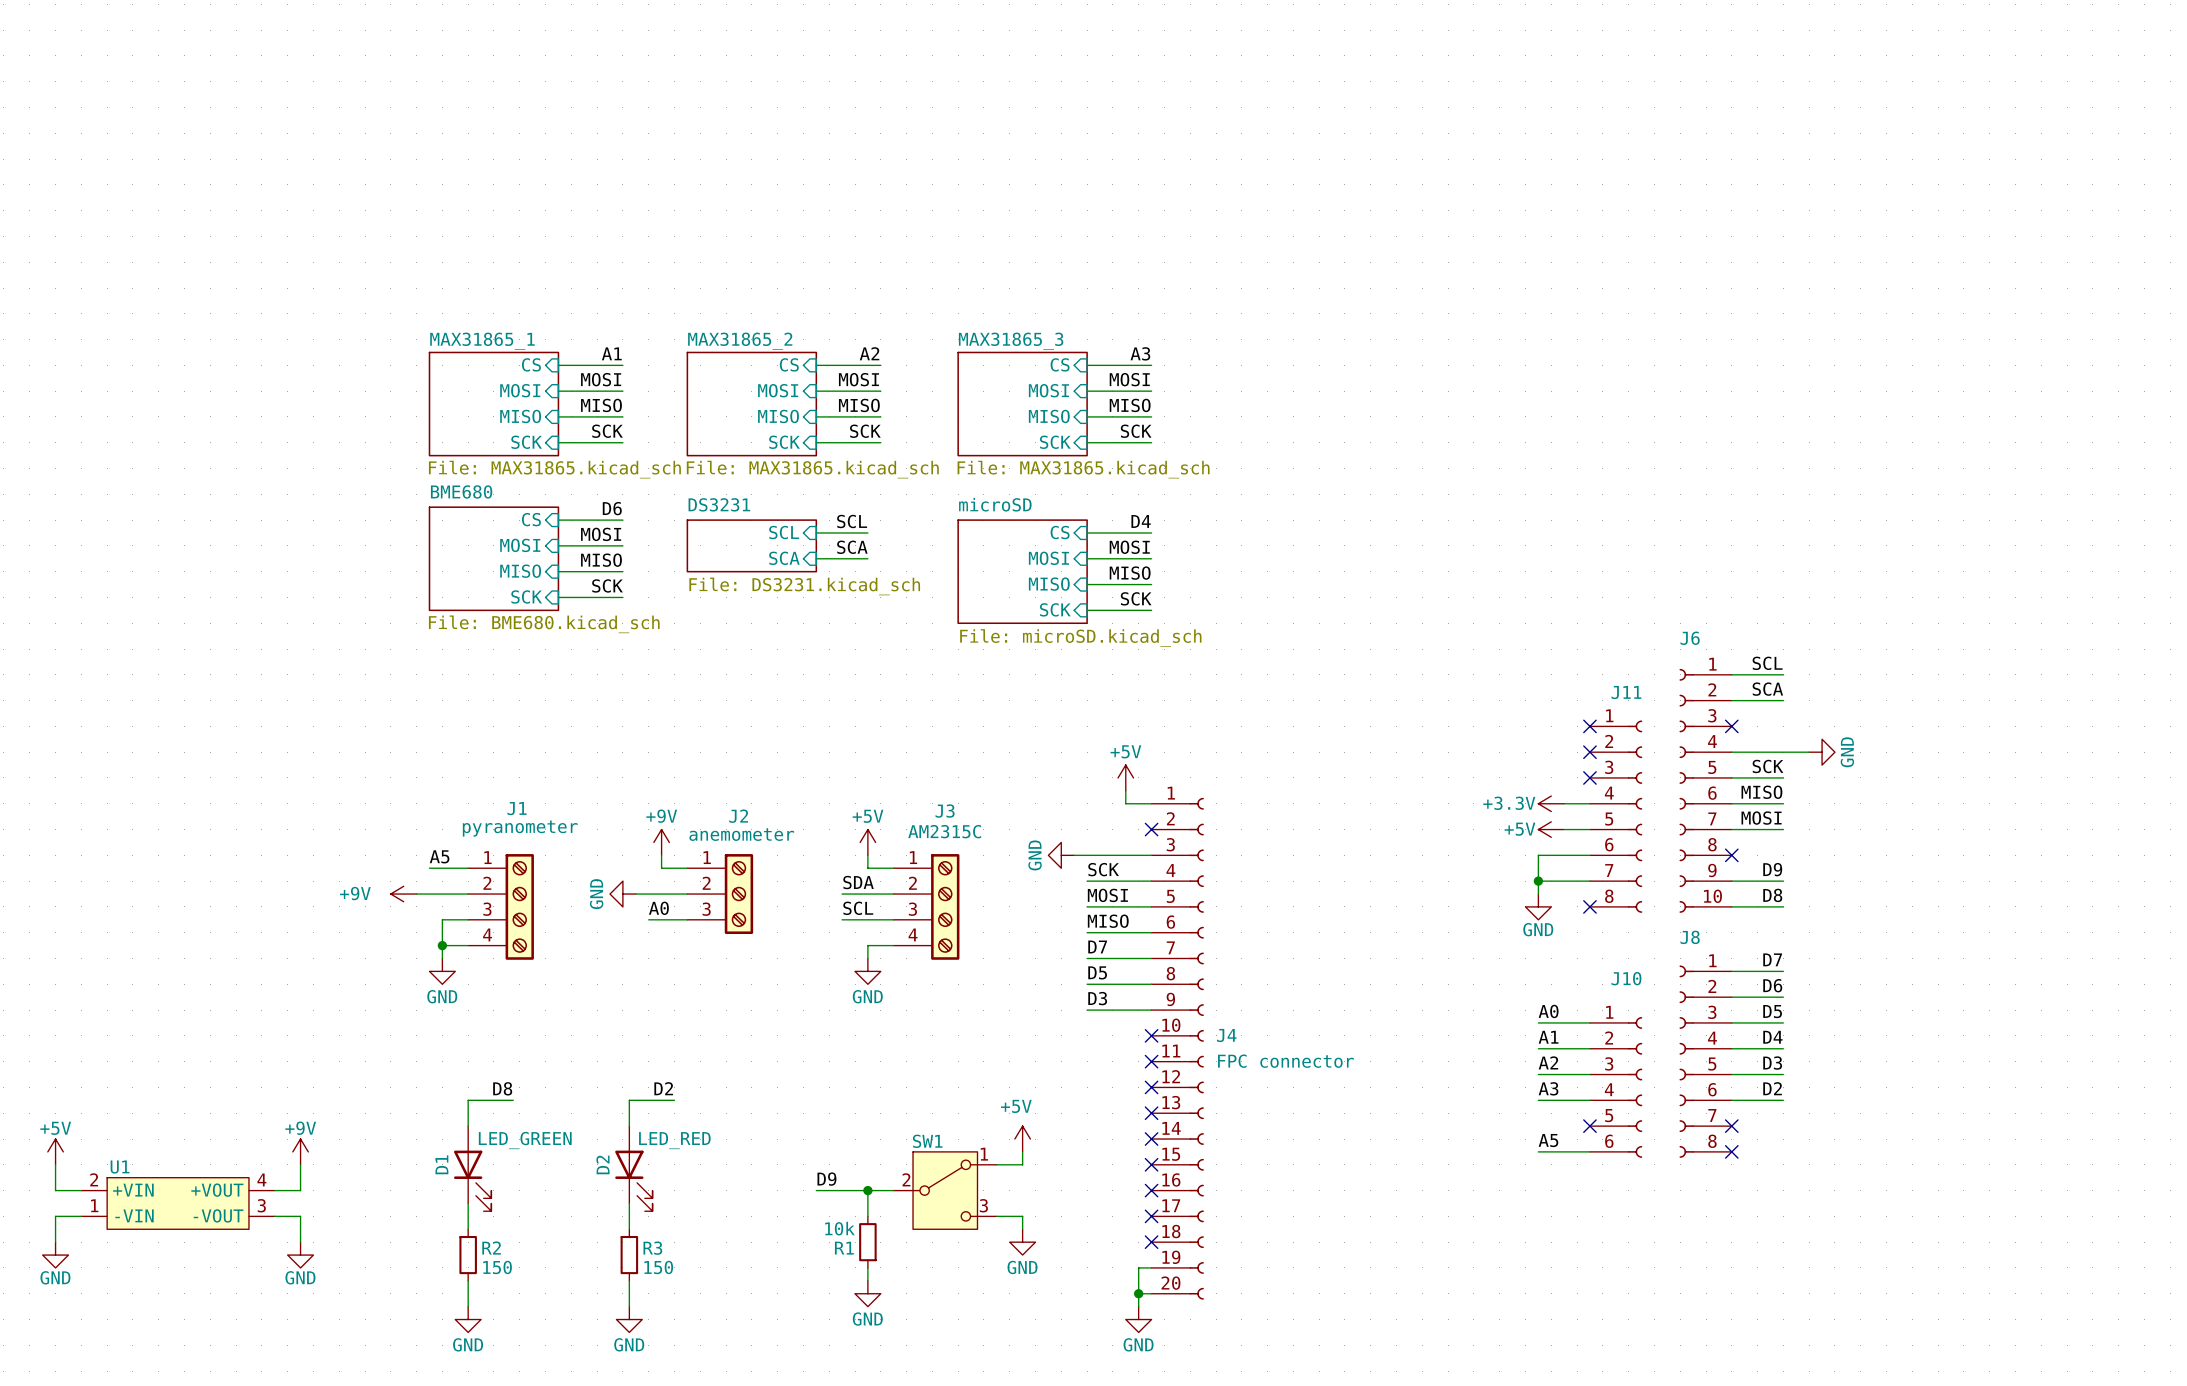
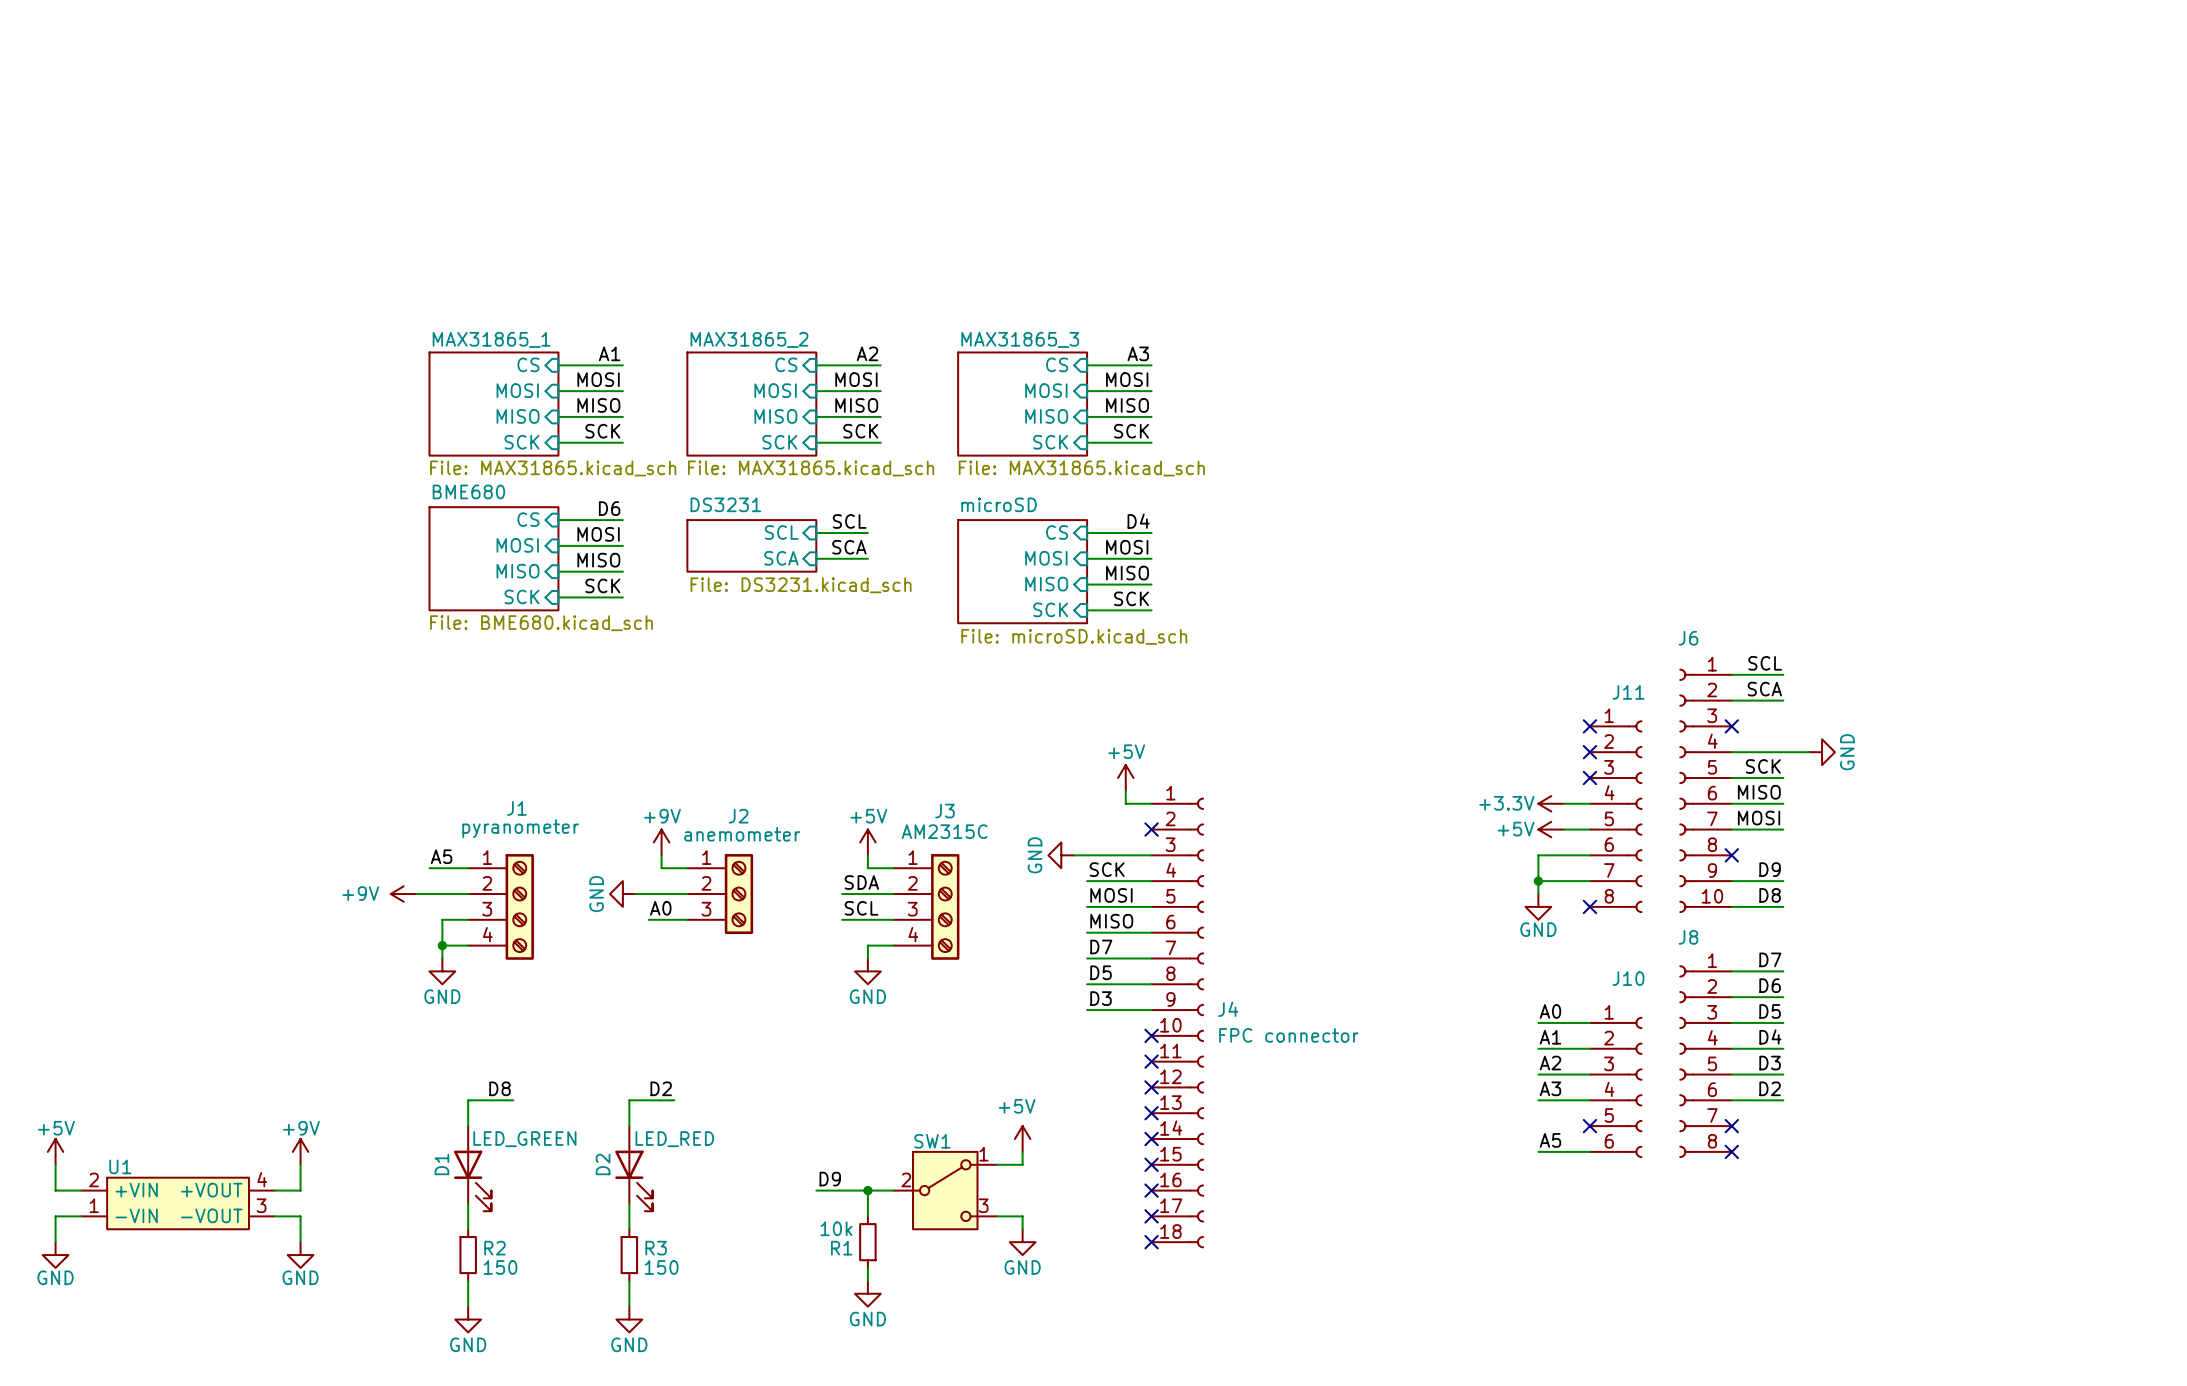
J4 symbol: [1151, 797, 1204, 1300] -> [1151, 797, 1204, 1249]
wire: (1151, 1267) (1138, 1267) (1138, 1306) -> none
wire: (1138, 1293) (1151, 1293) -> none
junction: (1138, 1293) -> none
power symbol: GND (1138, 1319) -> none

